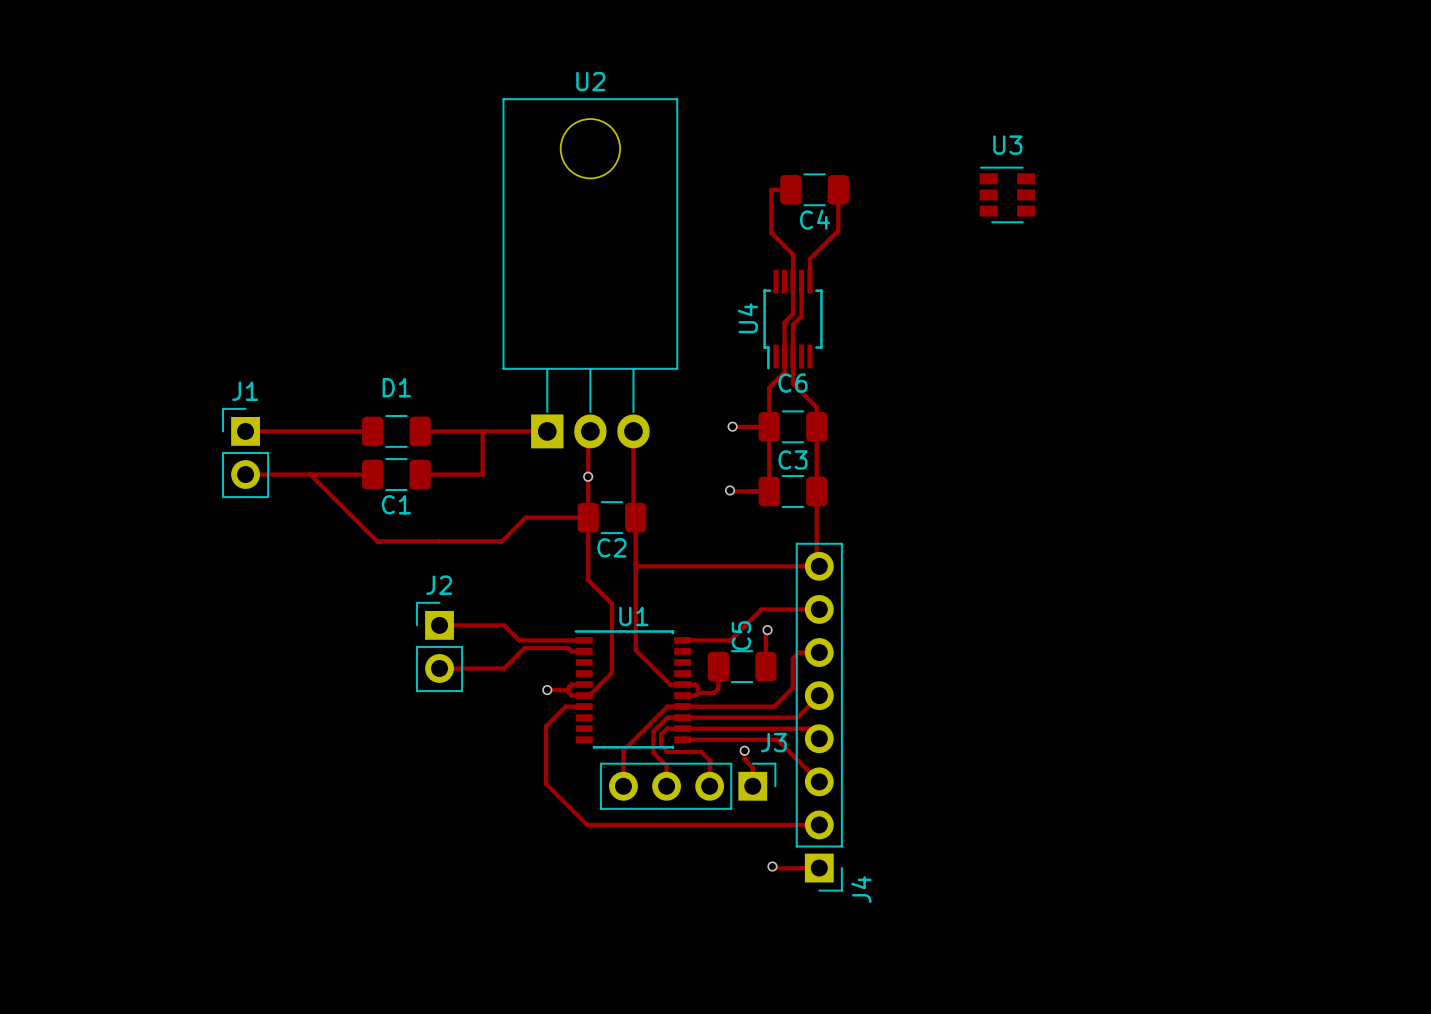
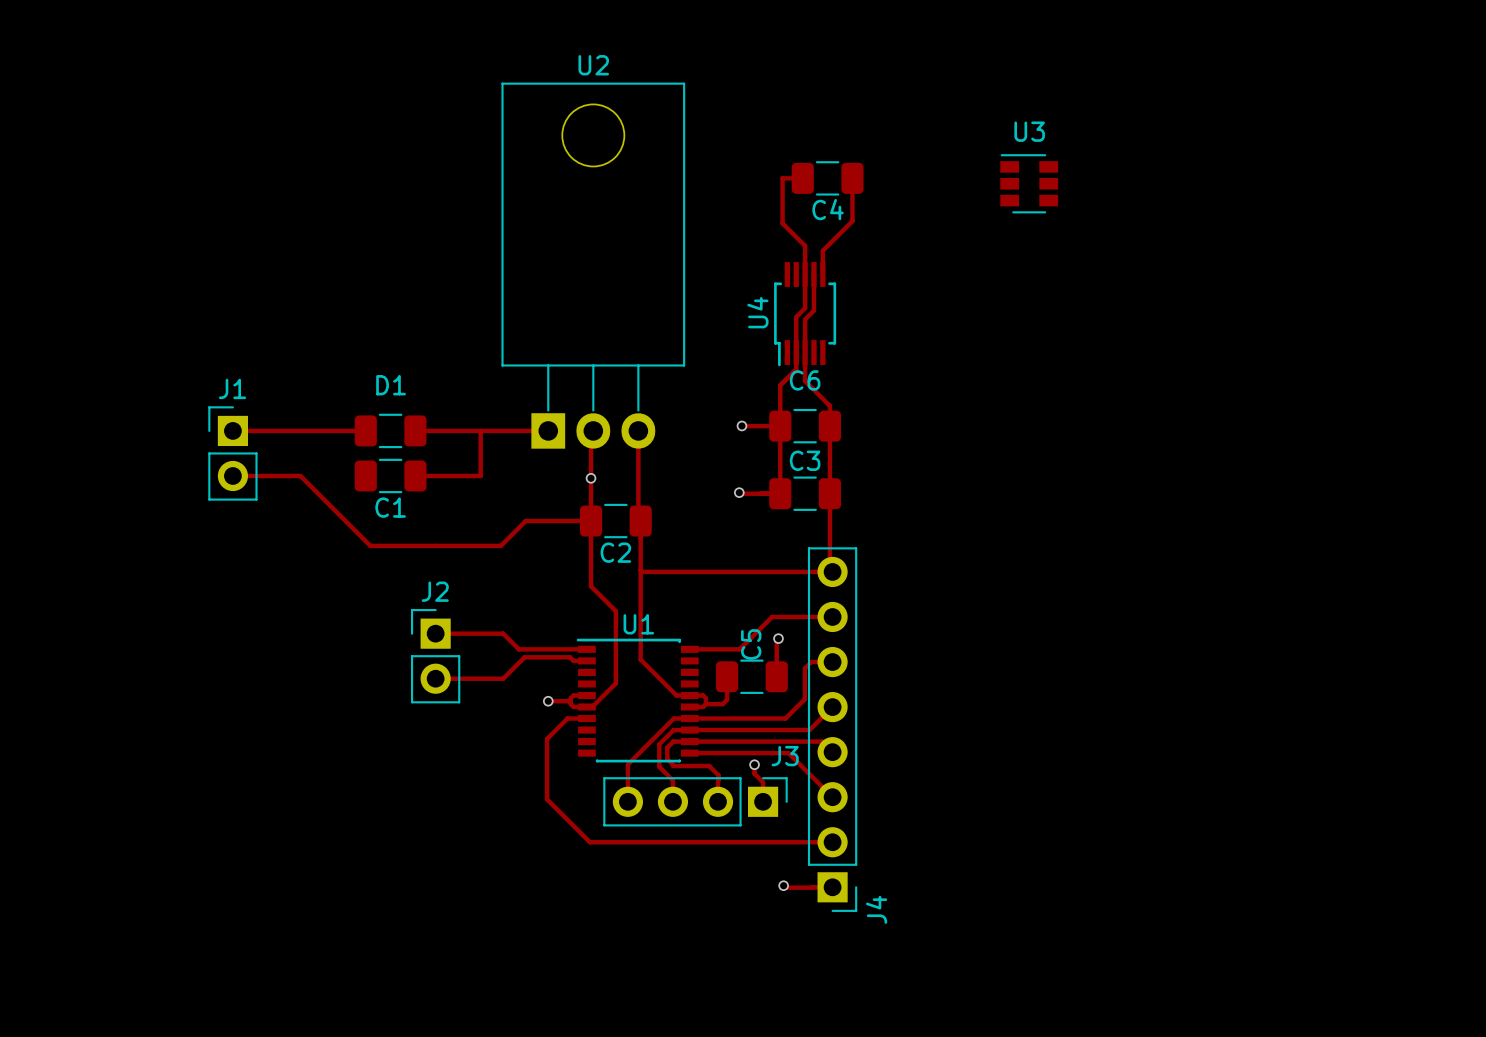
top track: (310, 474) (372, 474) -> none

